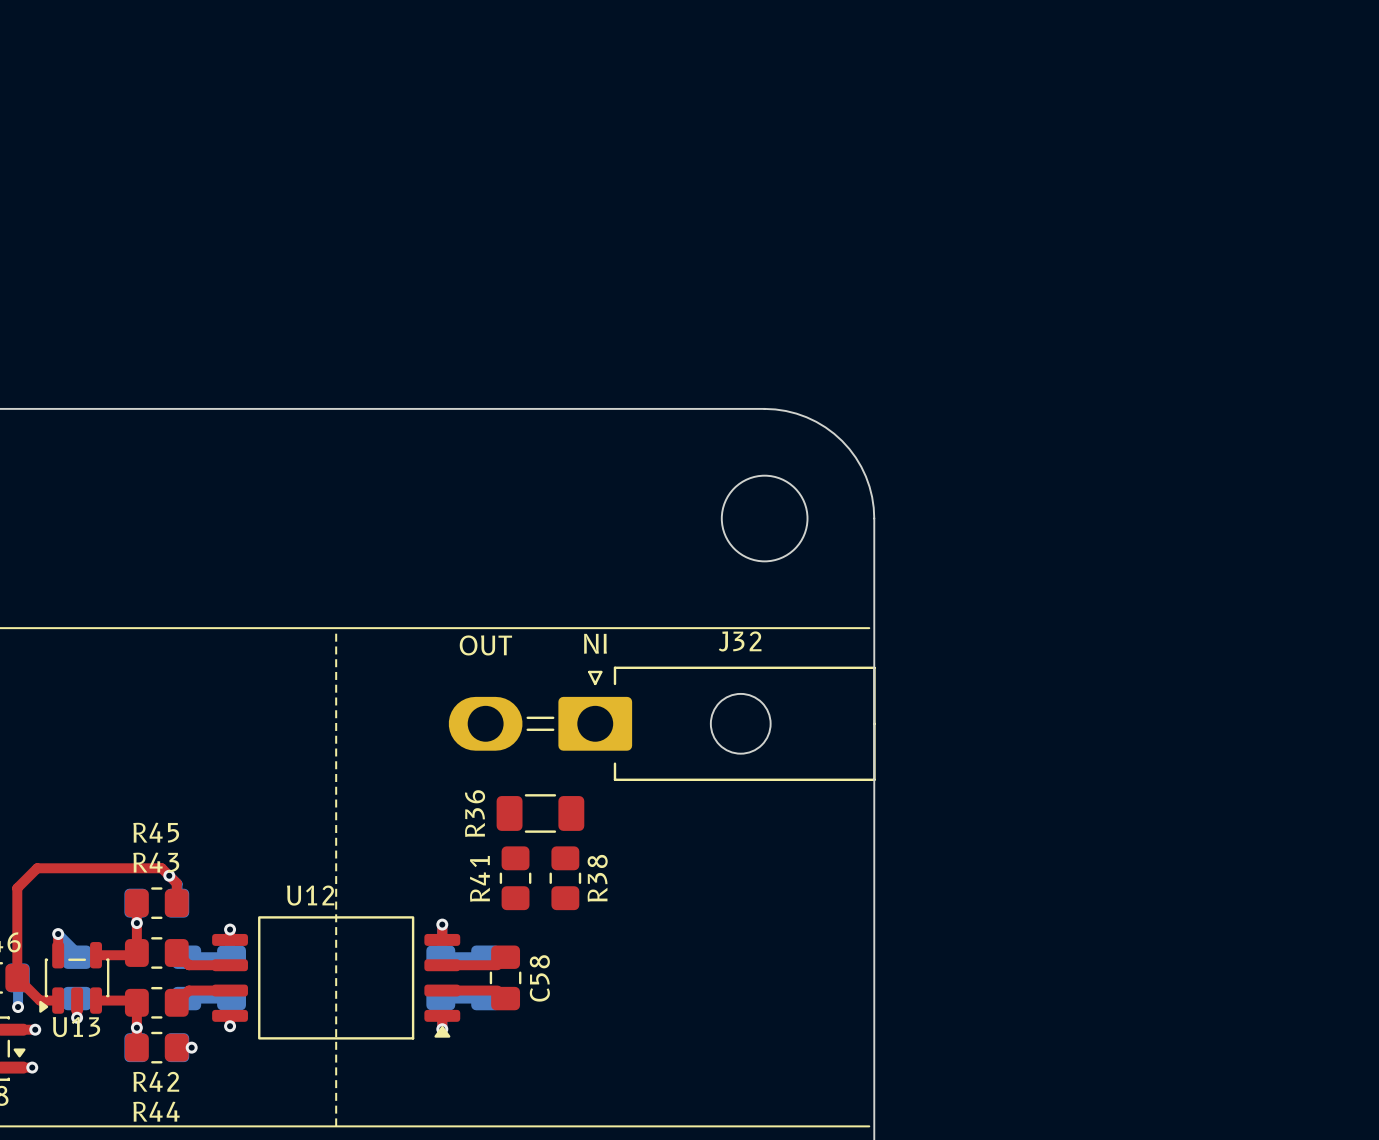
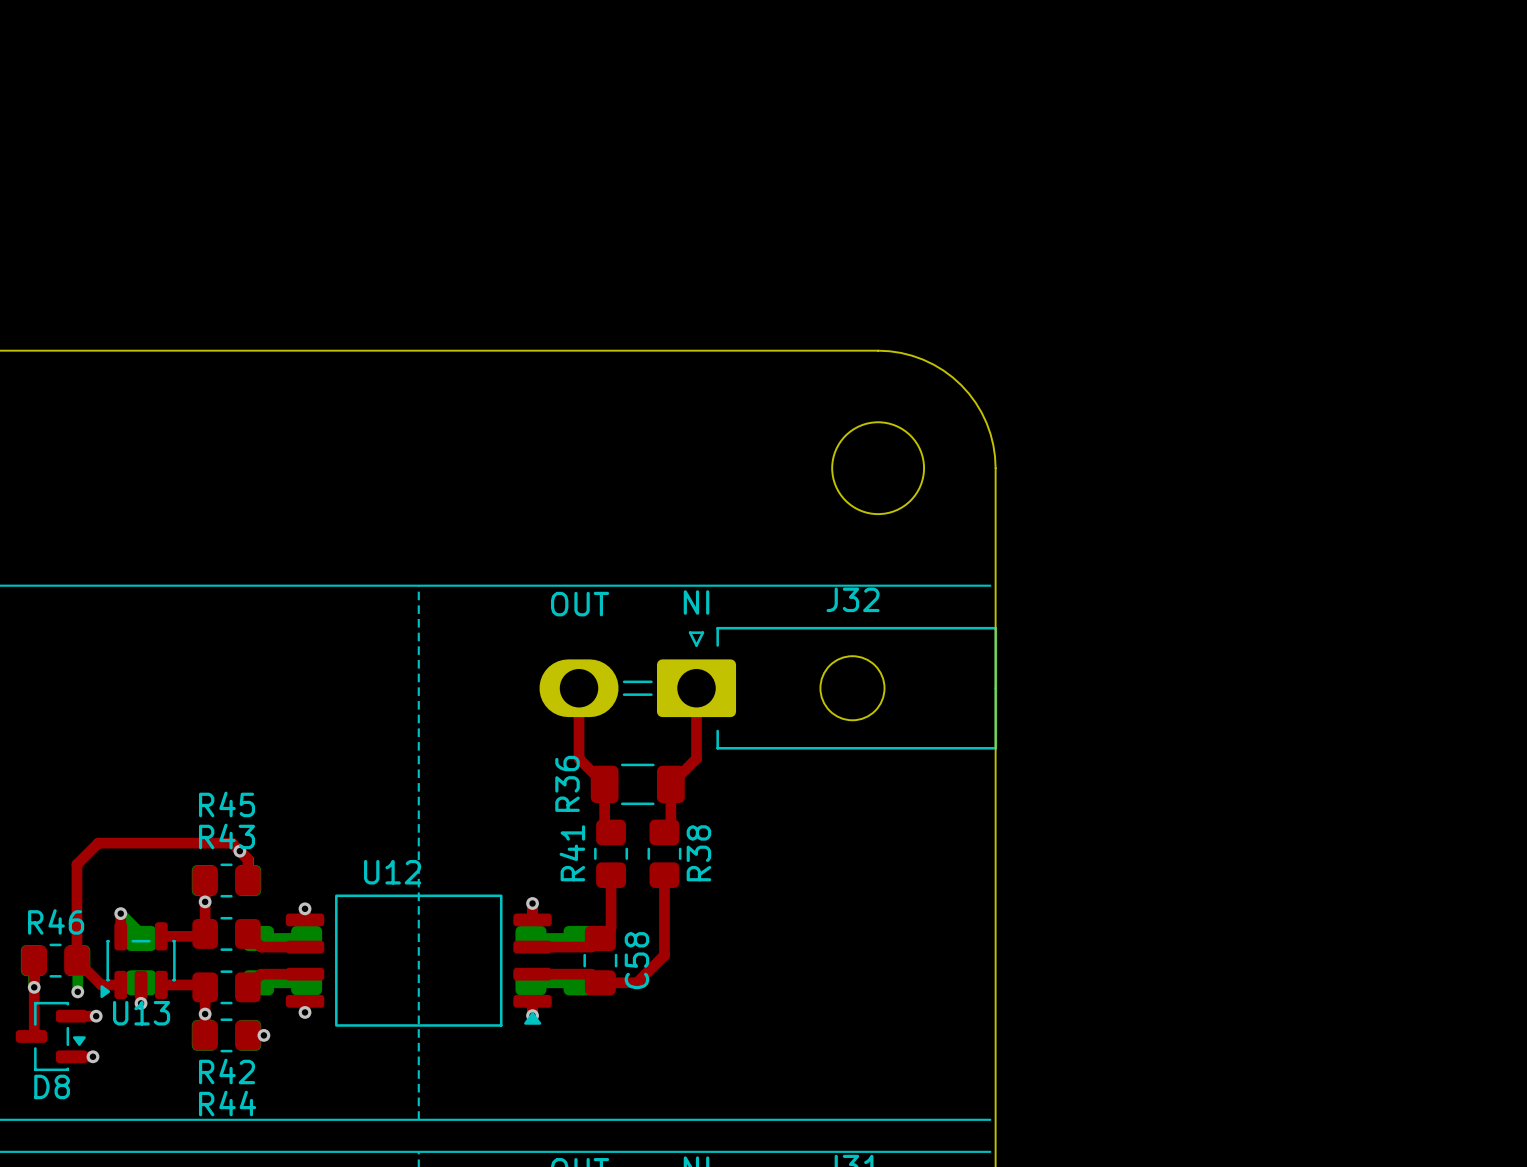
top track: none -> (579, 688) (579, 758) (604, 784) (604, 826) (611, 832)
top track: none -> (696, 688) (696, 758) (670, 784) (670, 826) (664, 832)
top track: none -> (611, 875) (611, 927) (600, 938)
top track: none -> (664, 875) (664, 955) (636, 982) (600, 982)

